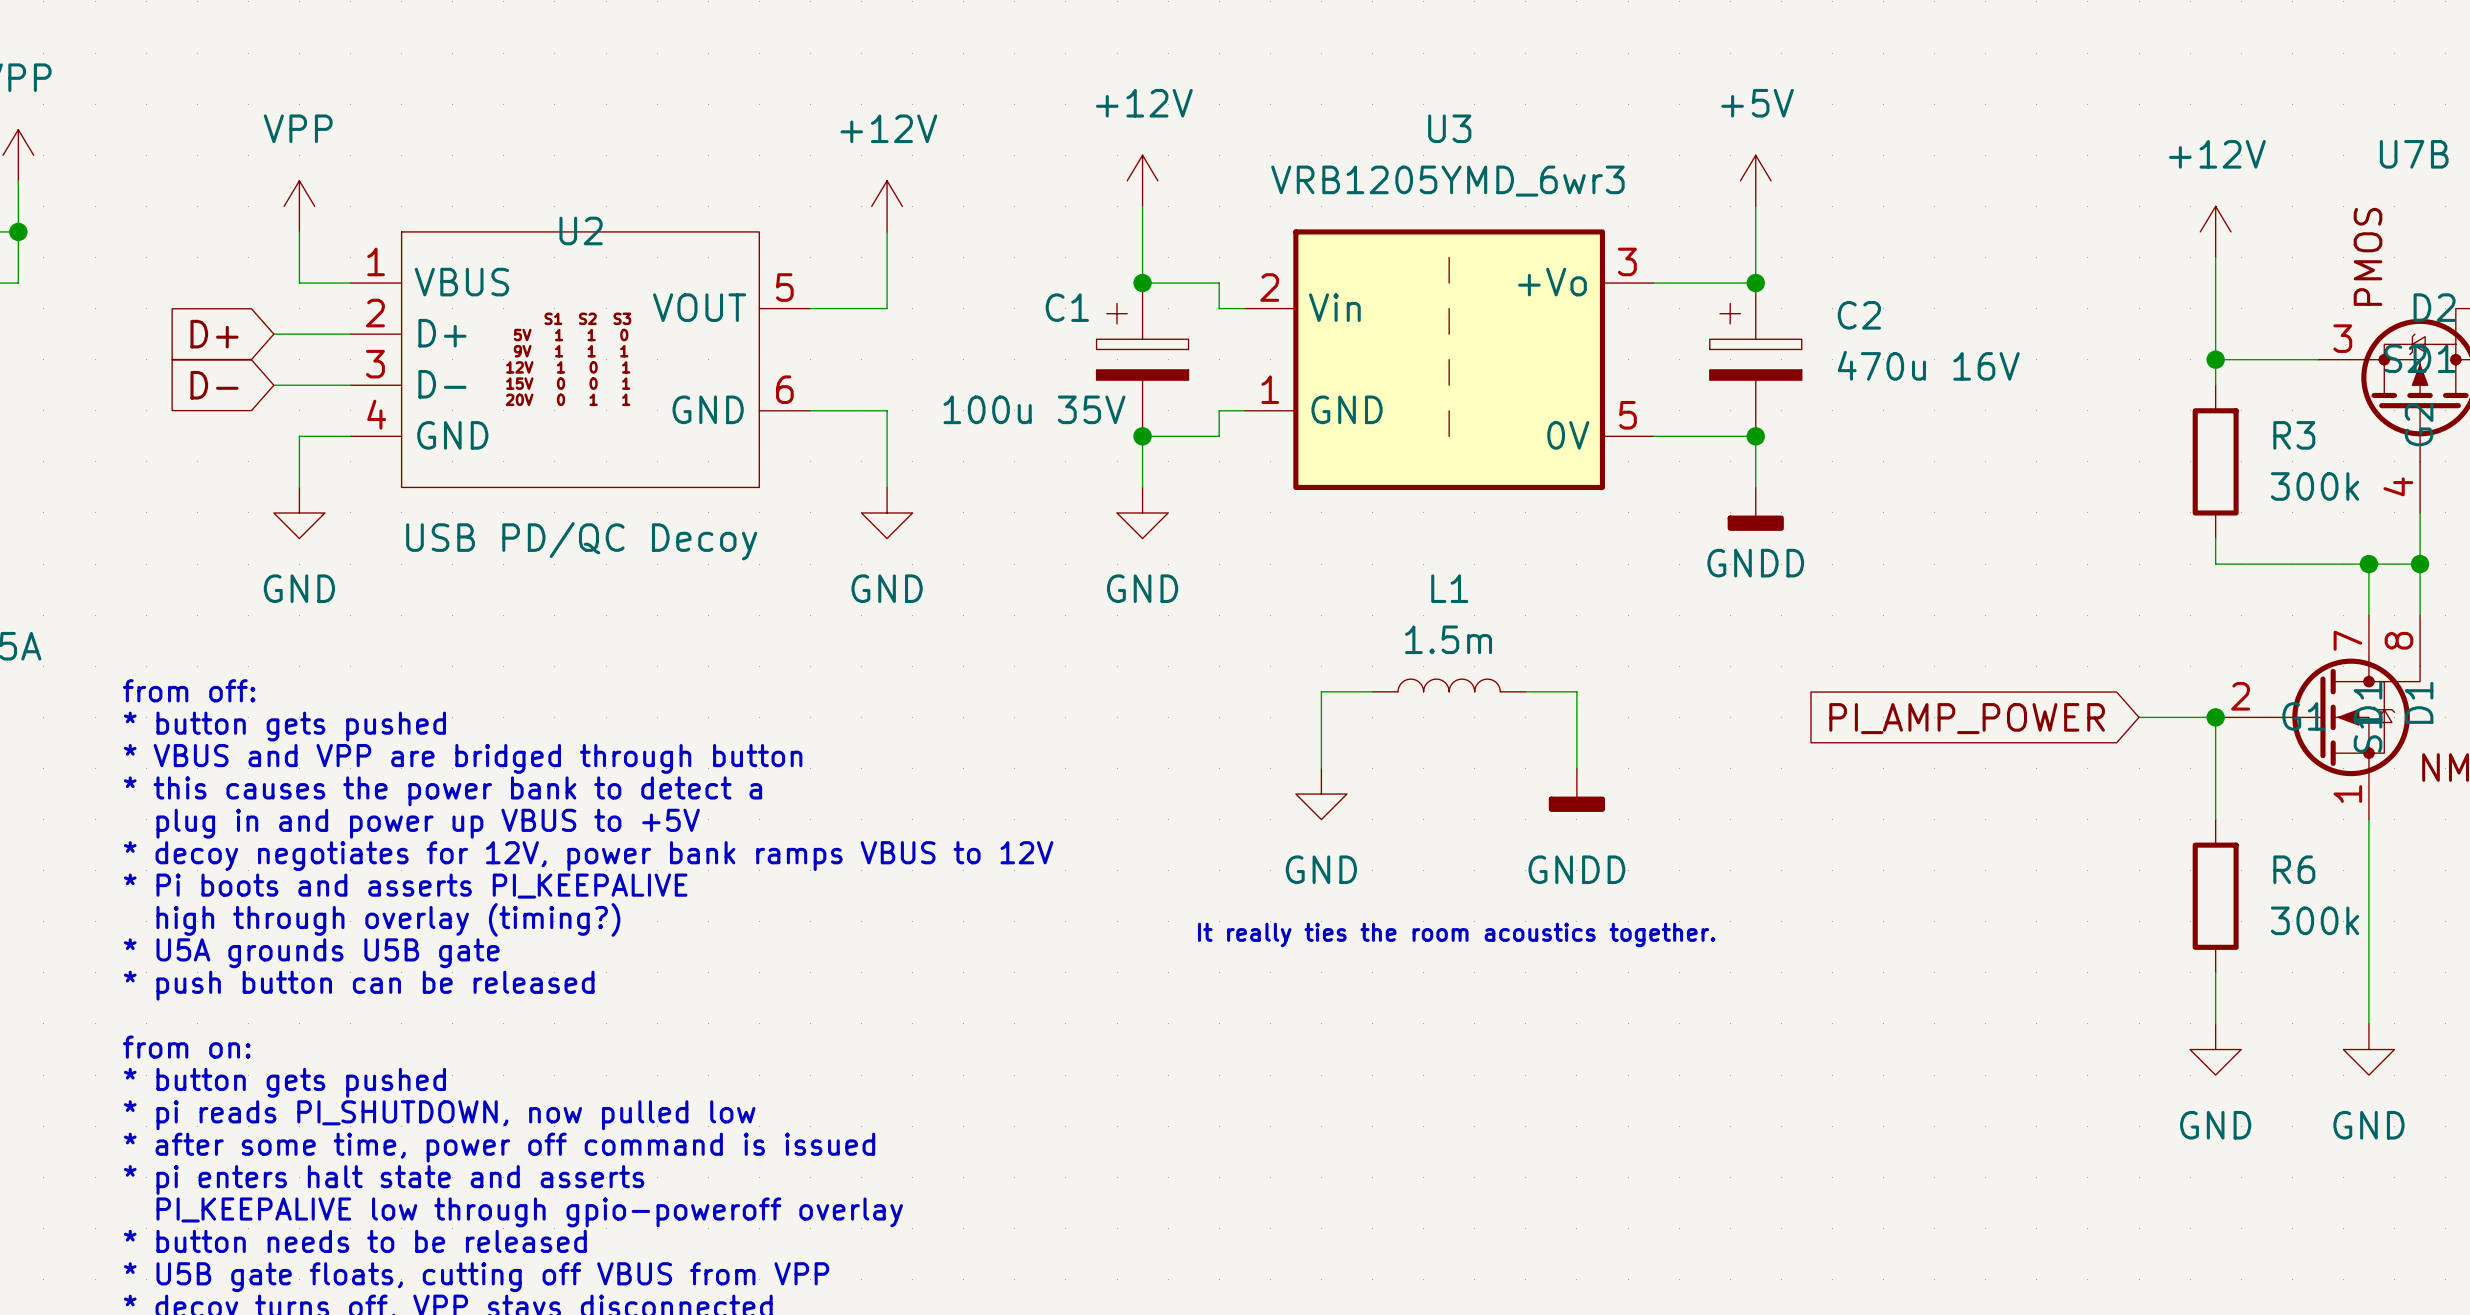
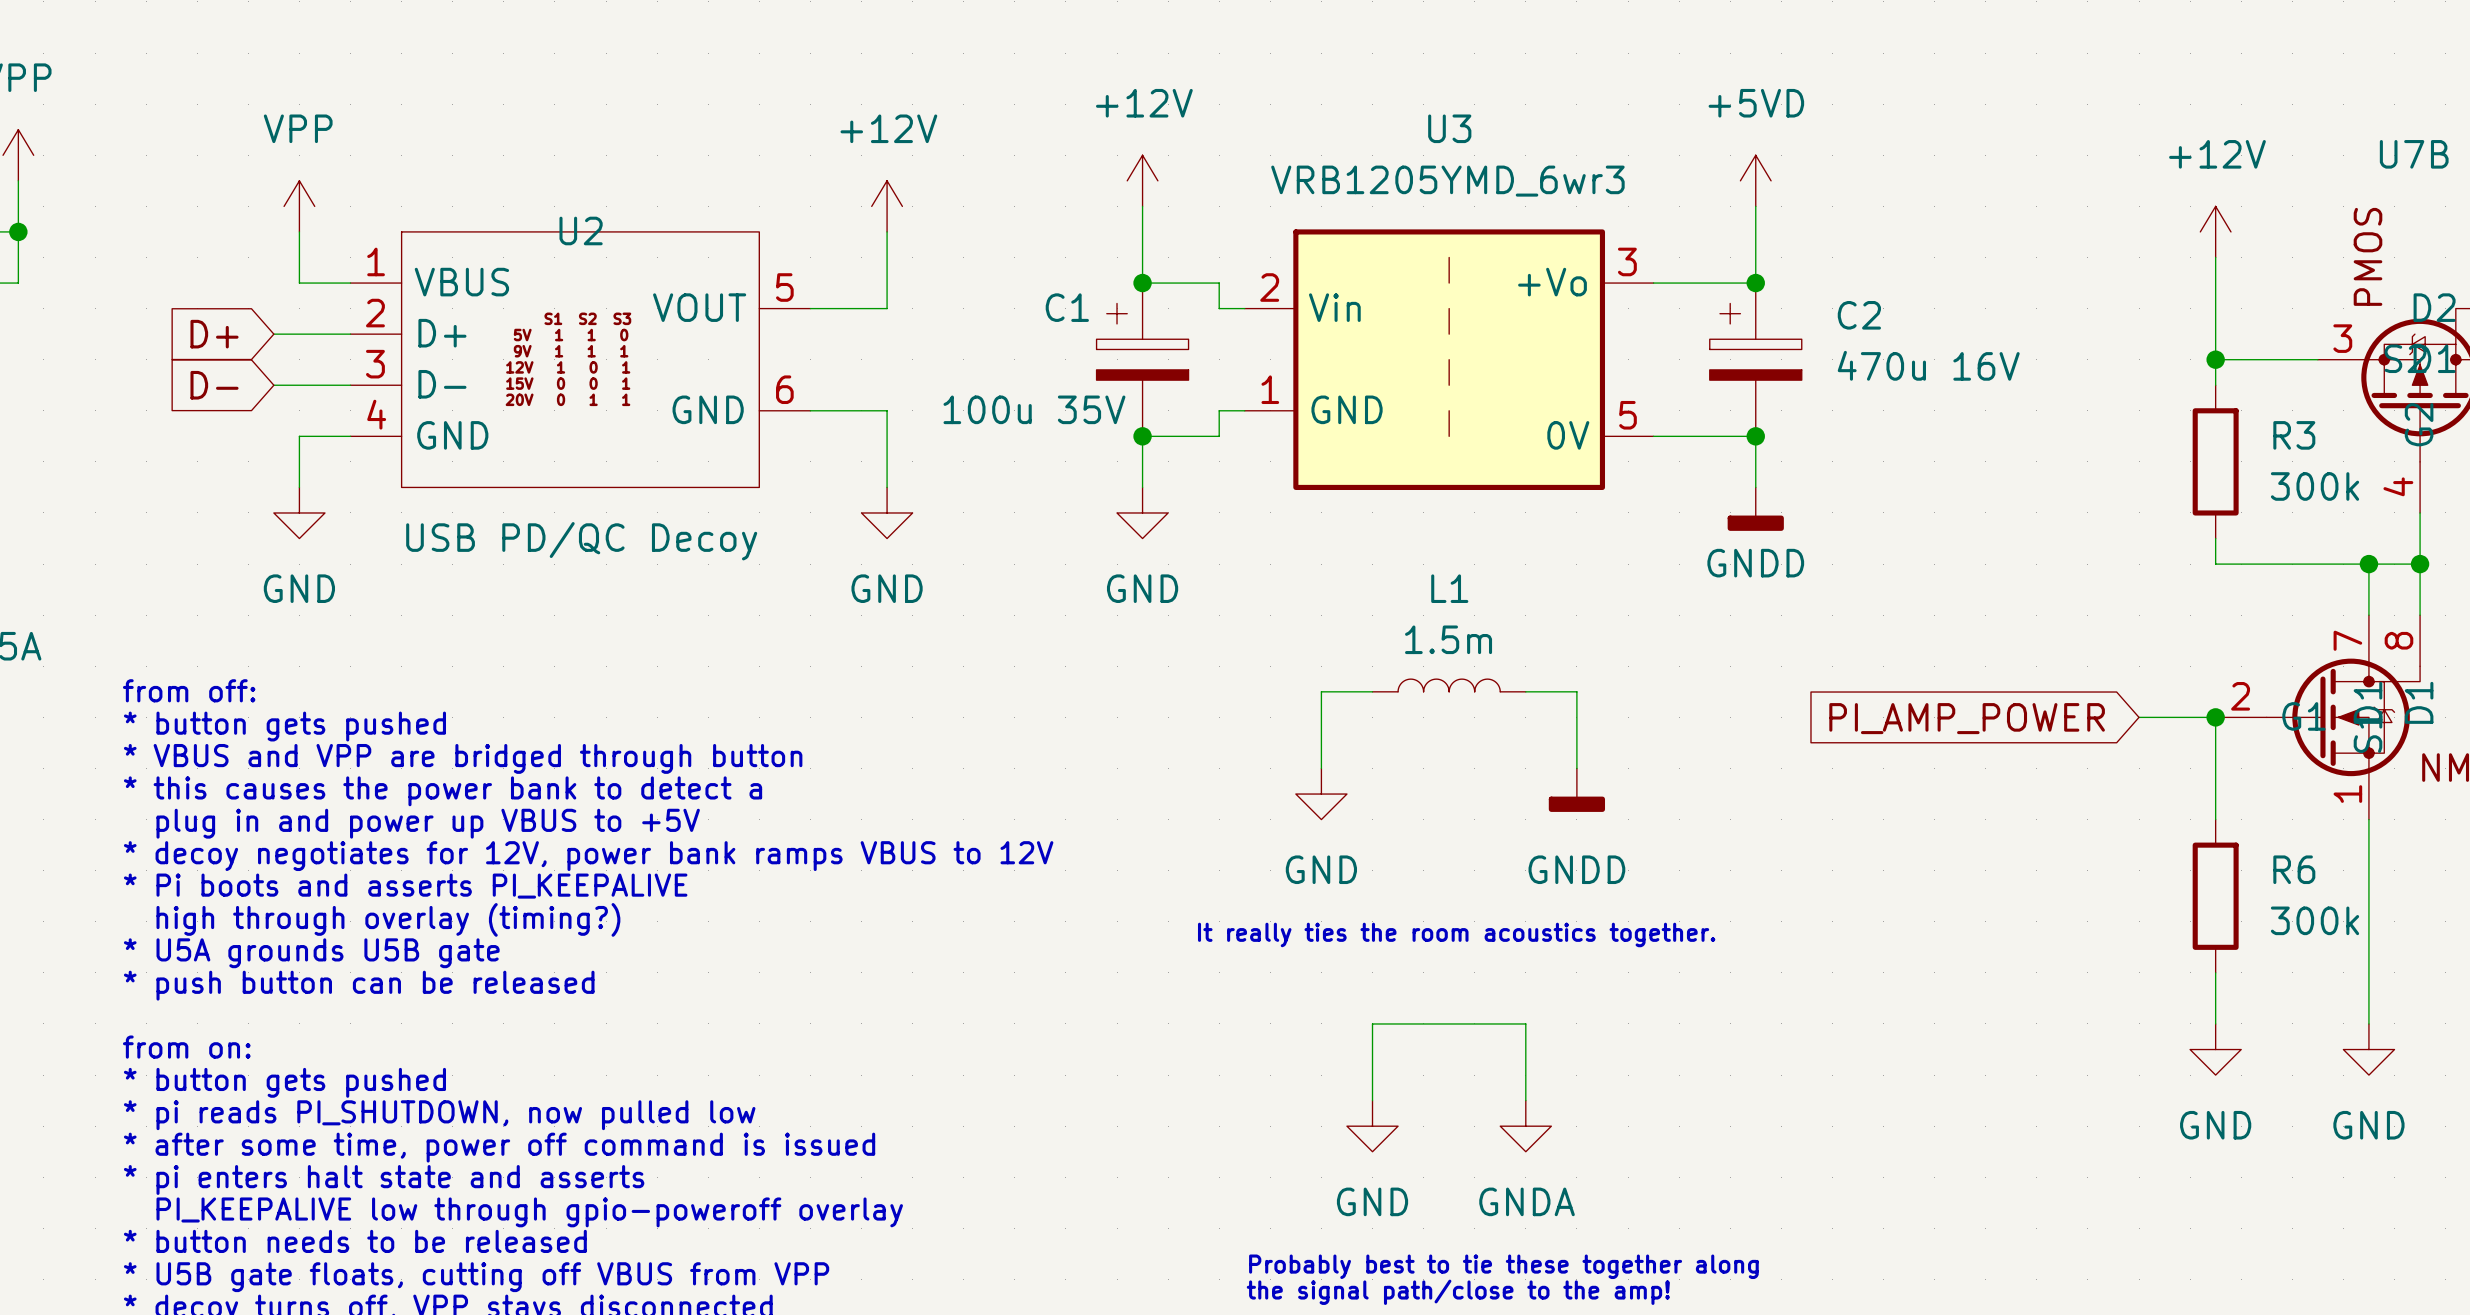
power symbol: +5V (1755, 180) -> +5VD (1755, 180)
wire: none -> (1372, 1100) (1372, 1023) (1525, 1023) (1525, 1100)
power symbol: none -> GND (1372, 1126)
power symbol: none -> GNDA (1525, 1126)
text: none -> Probably best to tie these together along (1503, 1266)
text: none -> the signal path/close to the amp! (1458, 1292)

